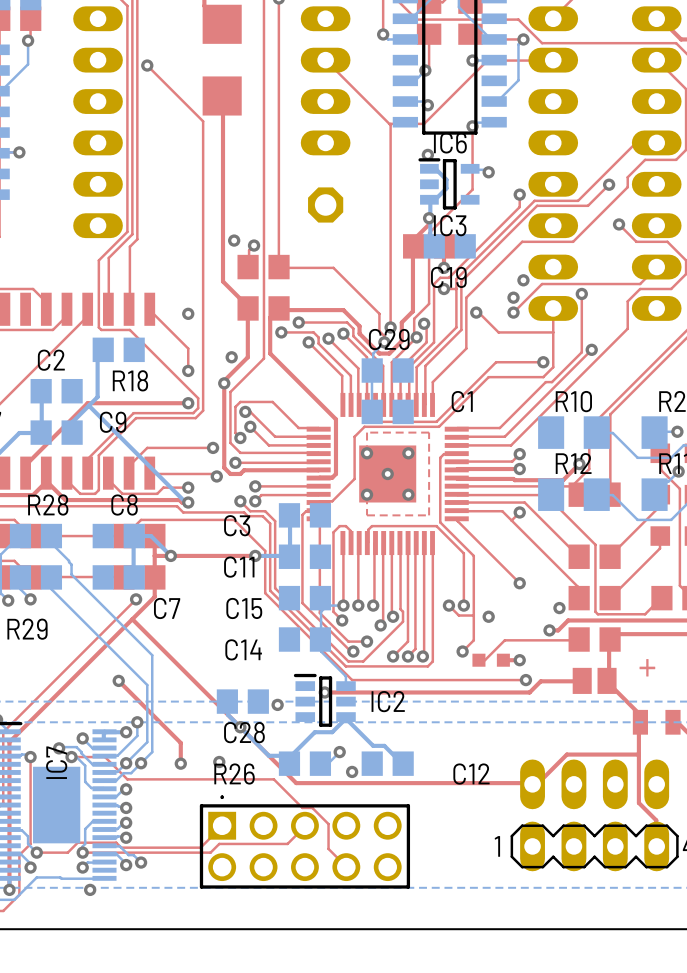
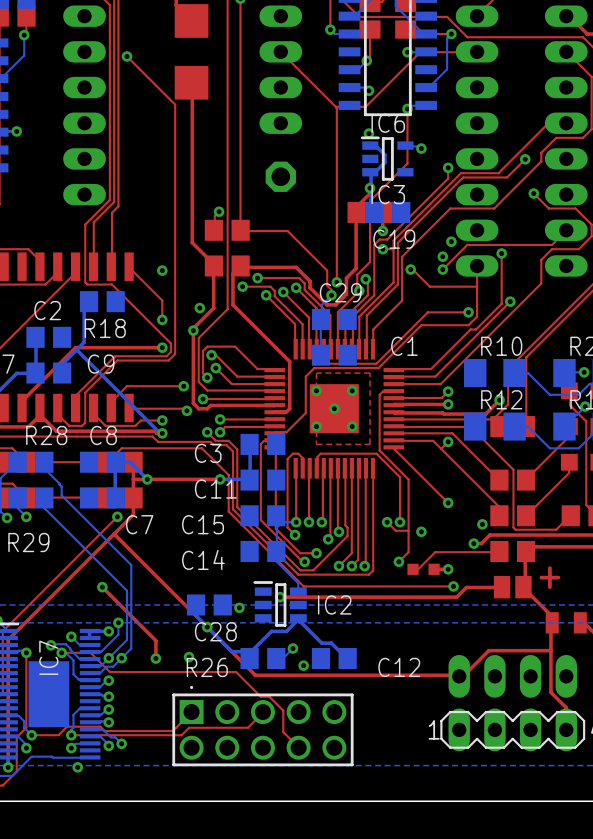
via: (234, 240) -> none

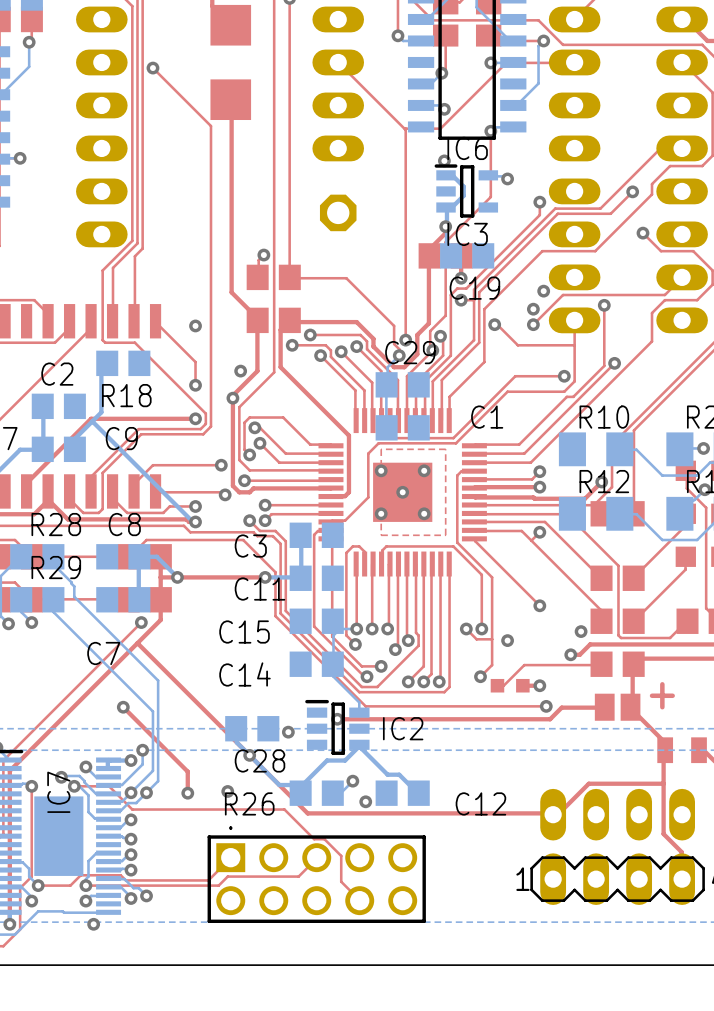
C7 name position: C7 (139, 524) -> C7 (103, 653)
R29 name position: R29 (28, 542) -> R29 (56, 567)

